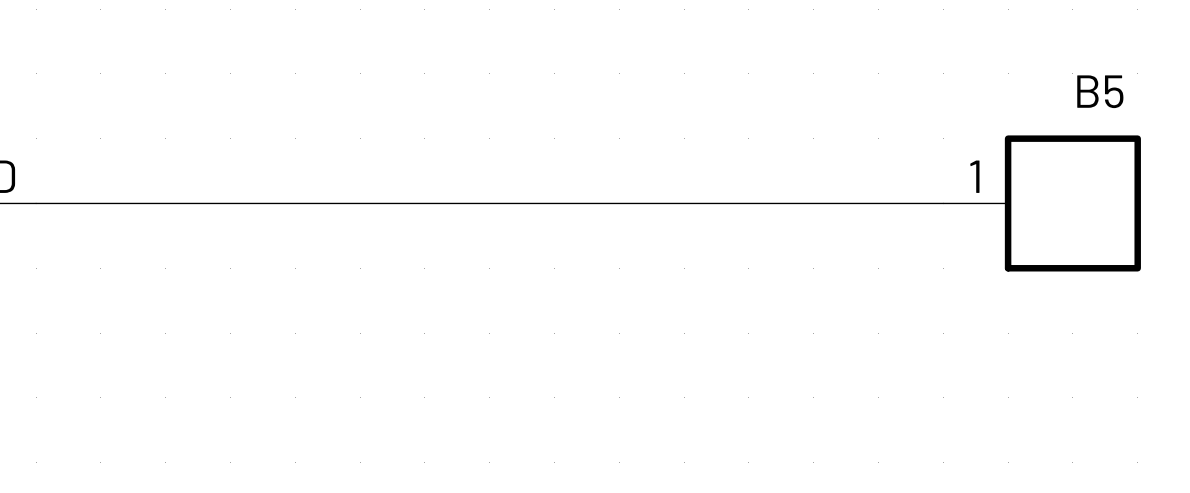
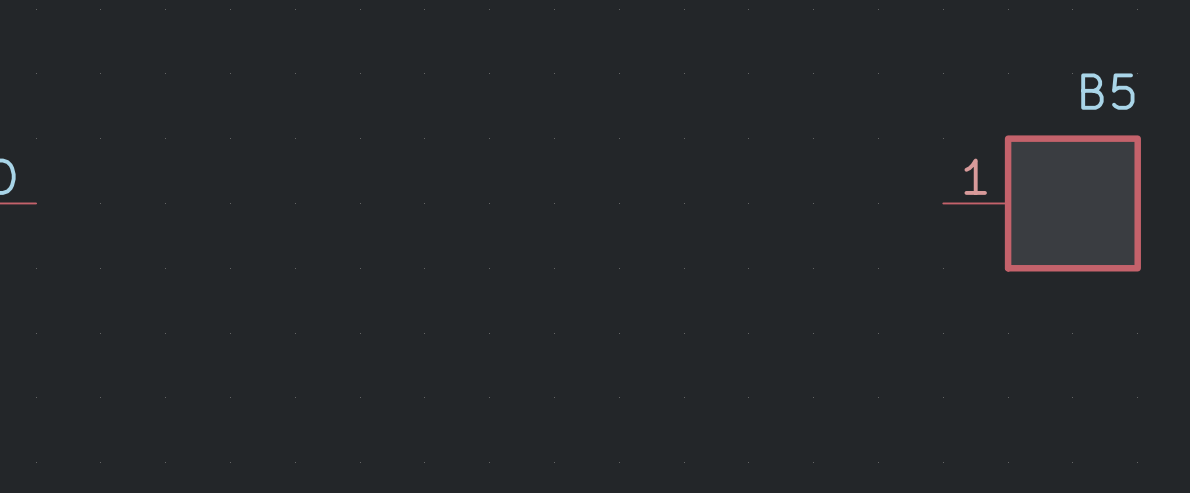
wire: (36, 203) (943, 203) -> none

